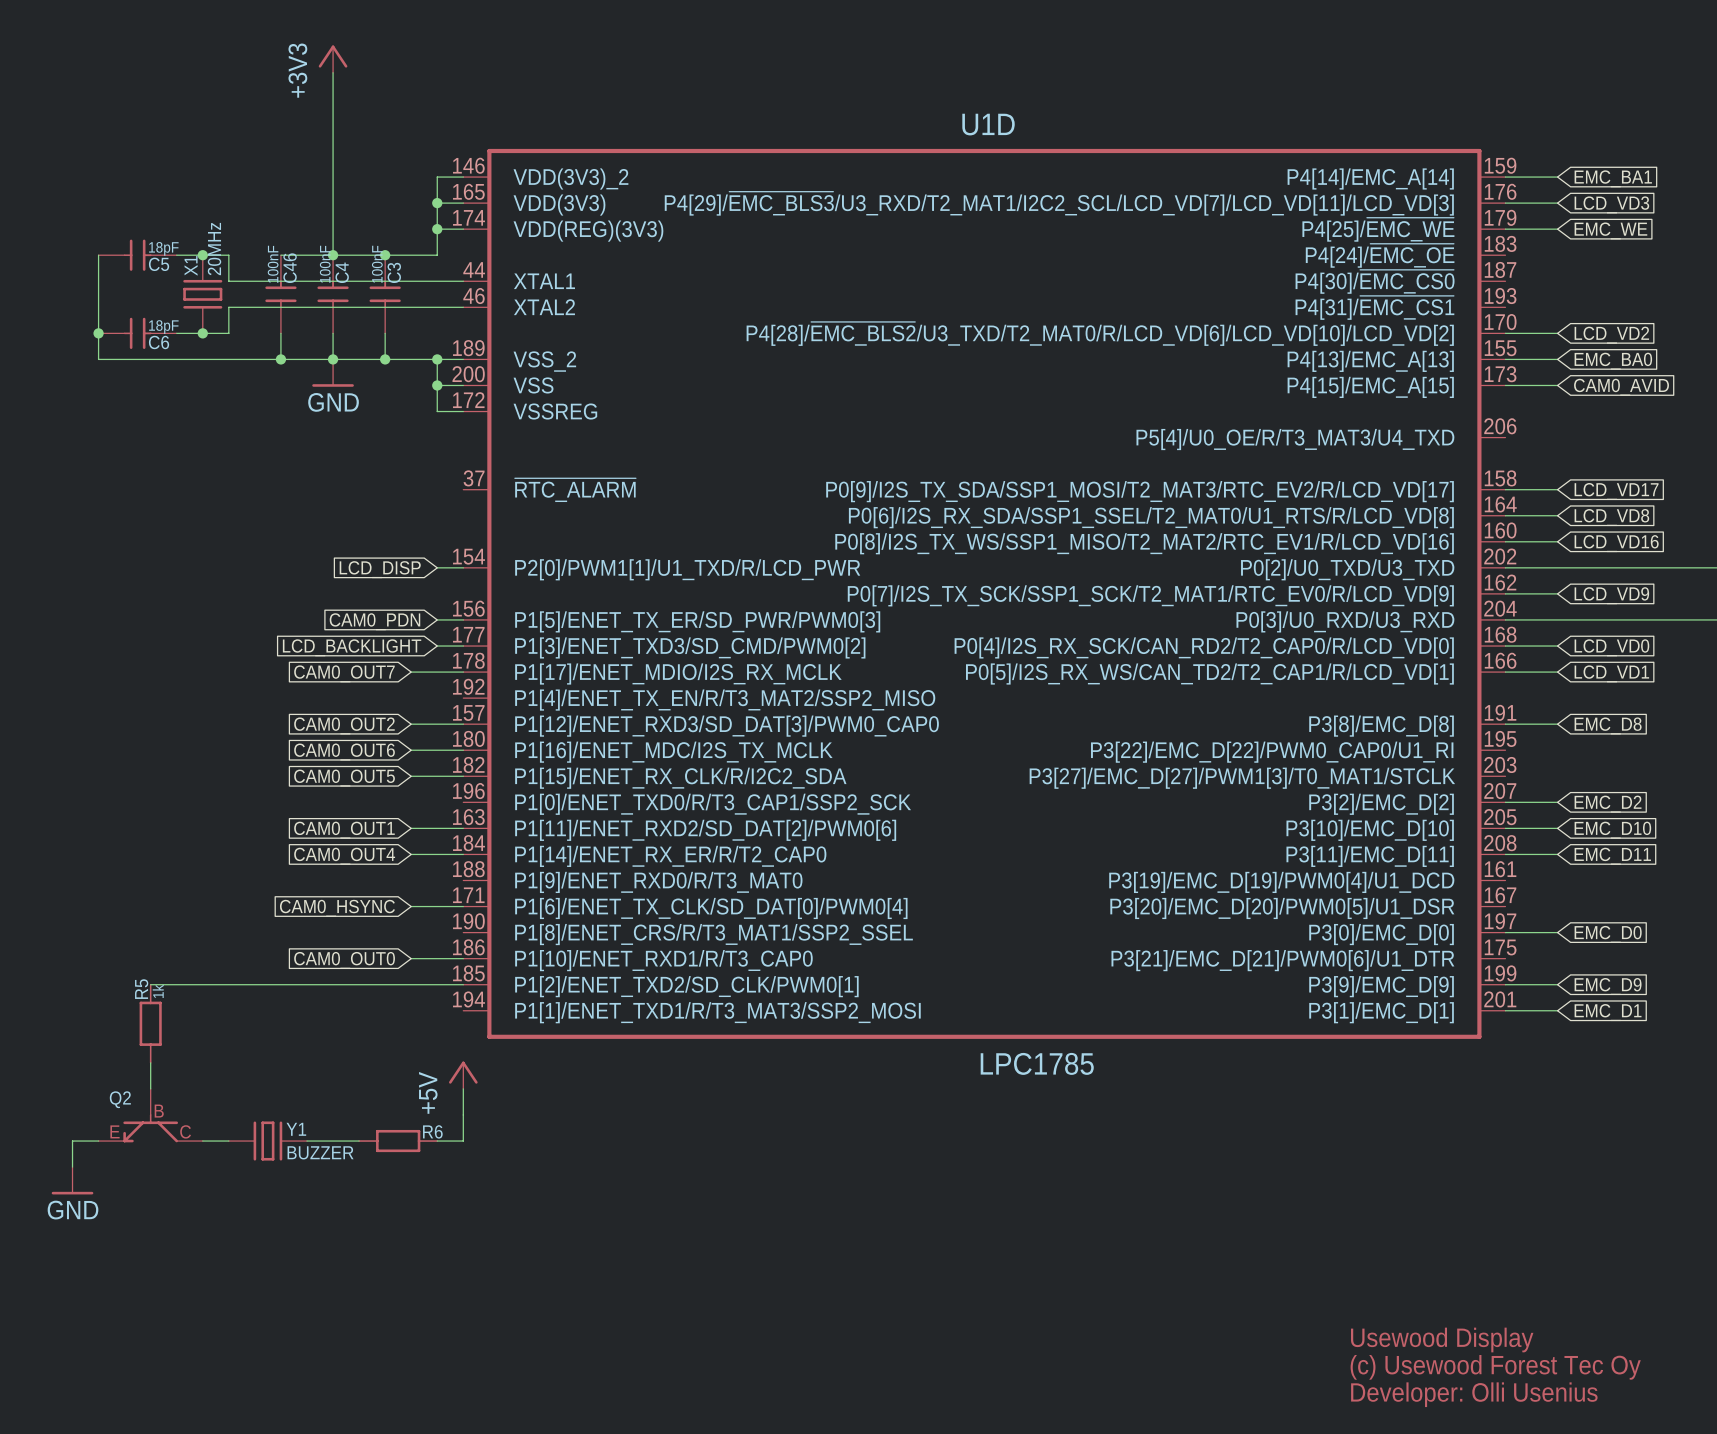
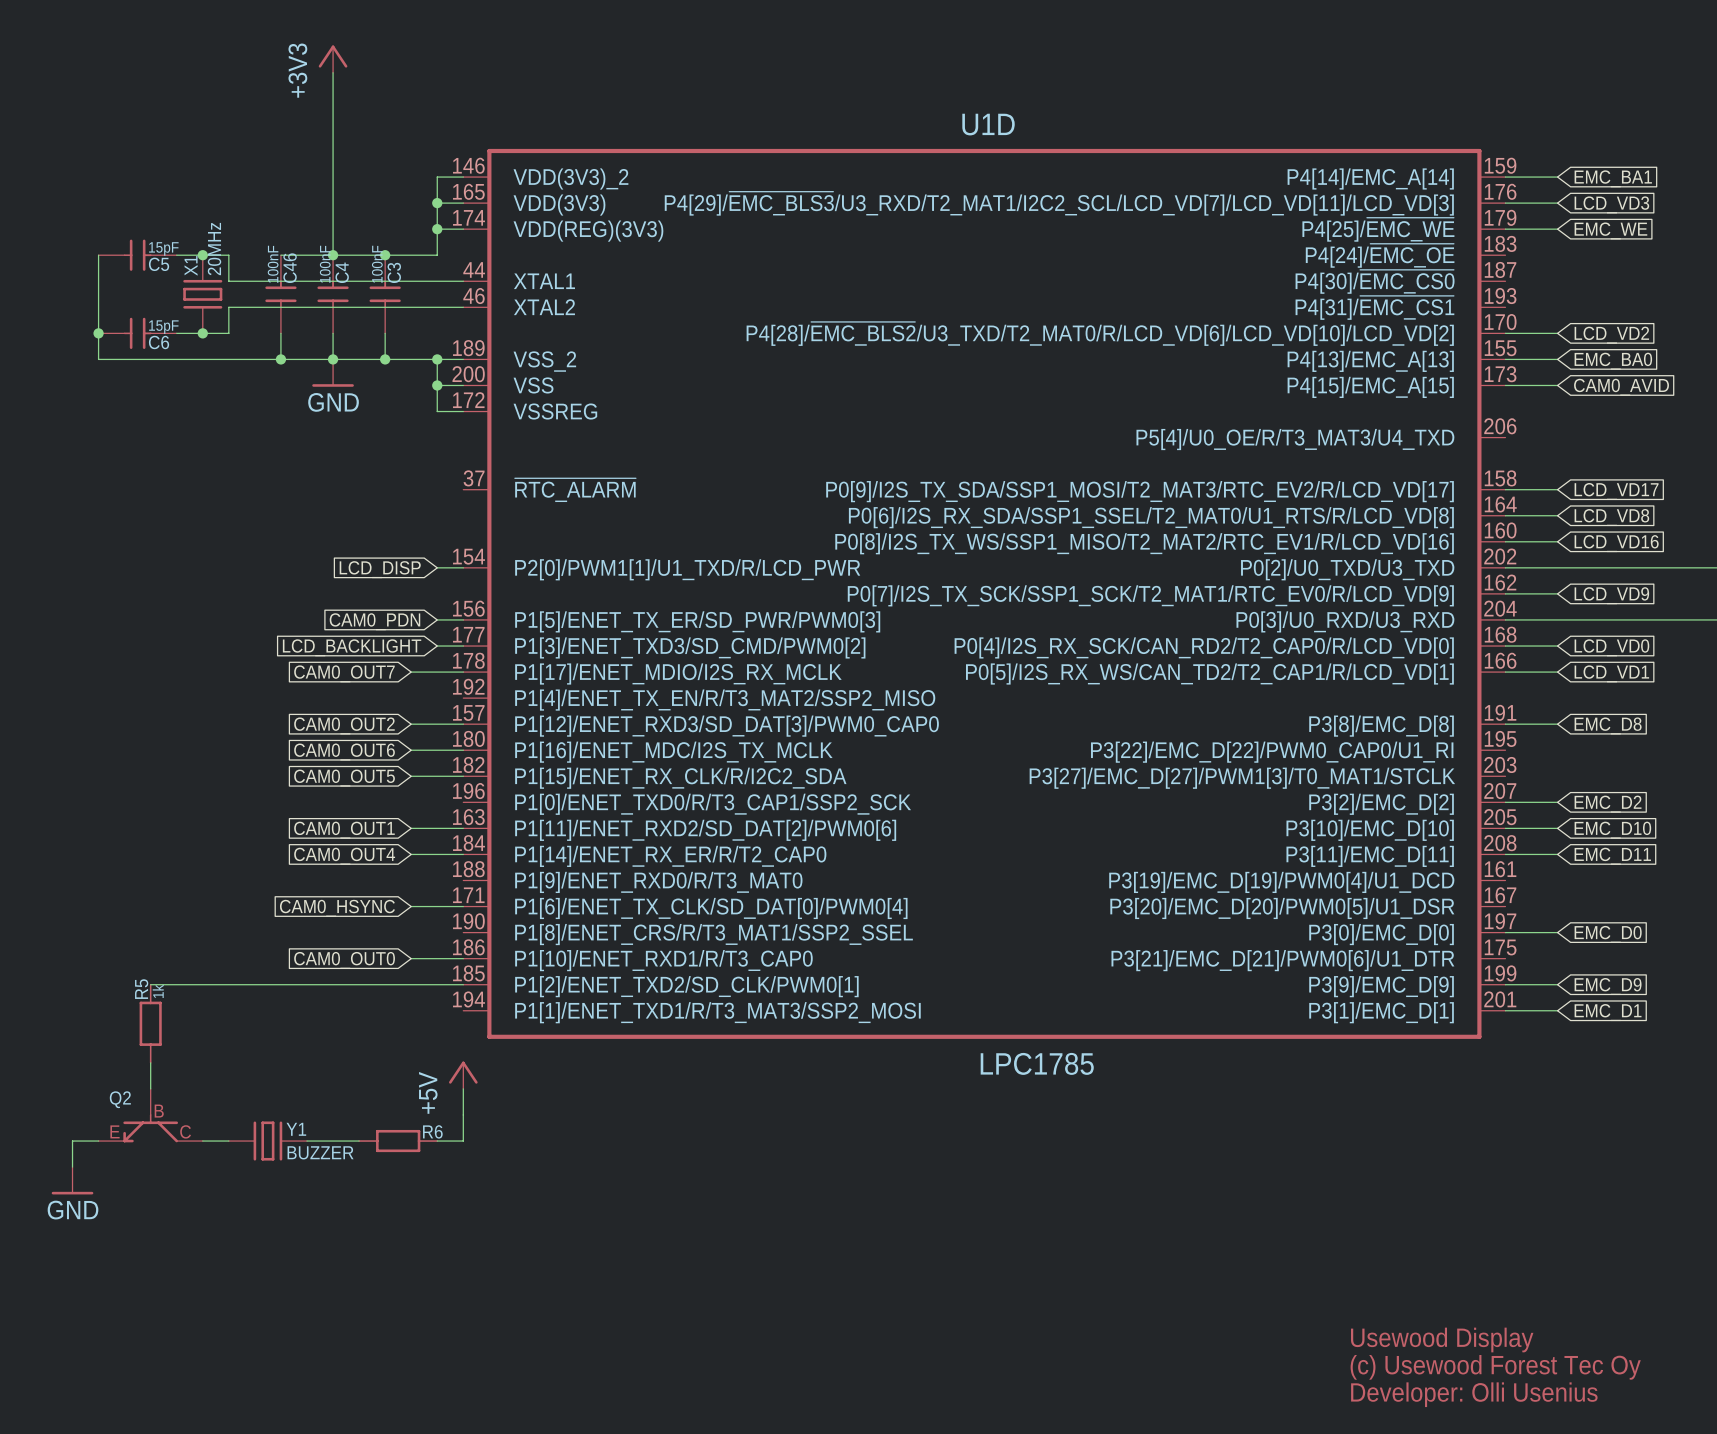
C5 value: 18pF (163, 248) -> 15pF (163, 248)
C6 value: 18pF (163, 327) -> 15pF (163, 327)

